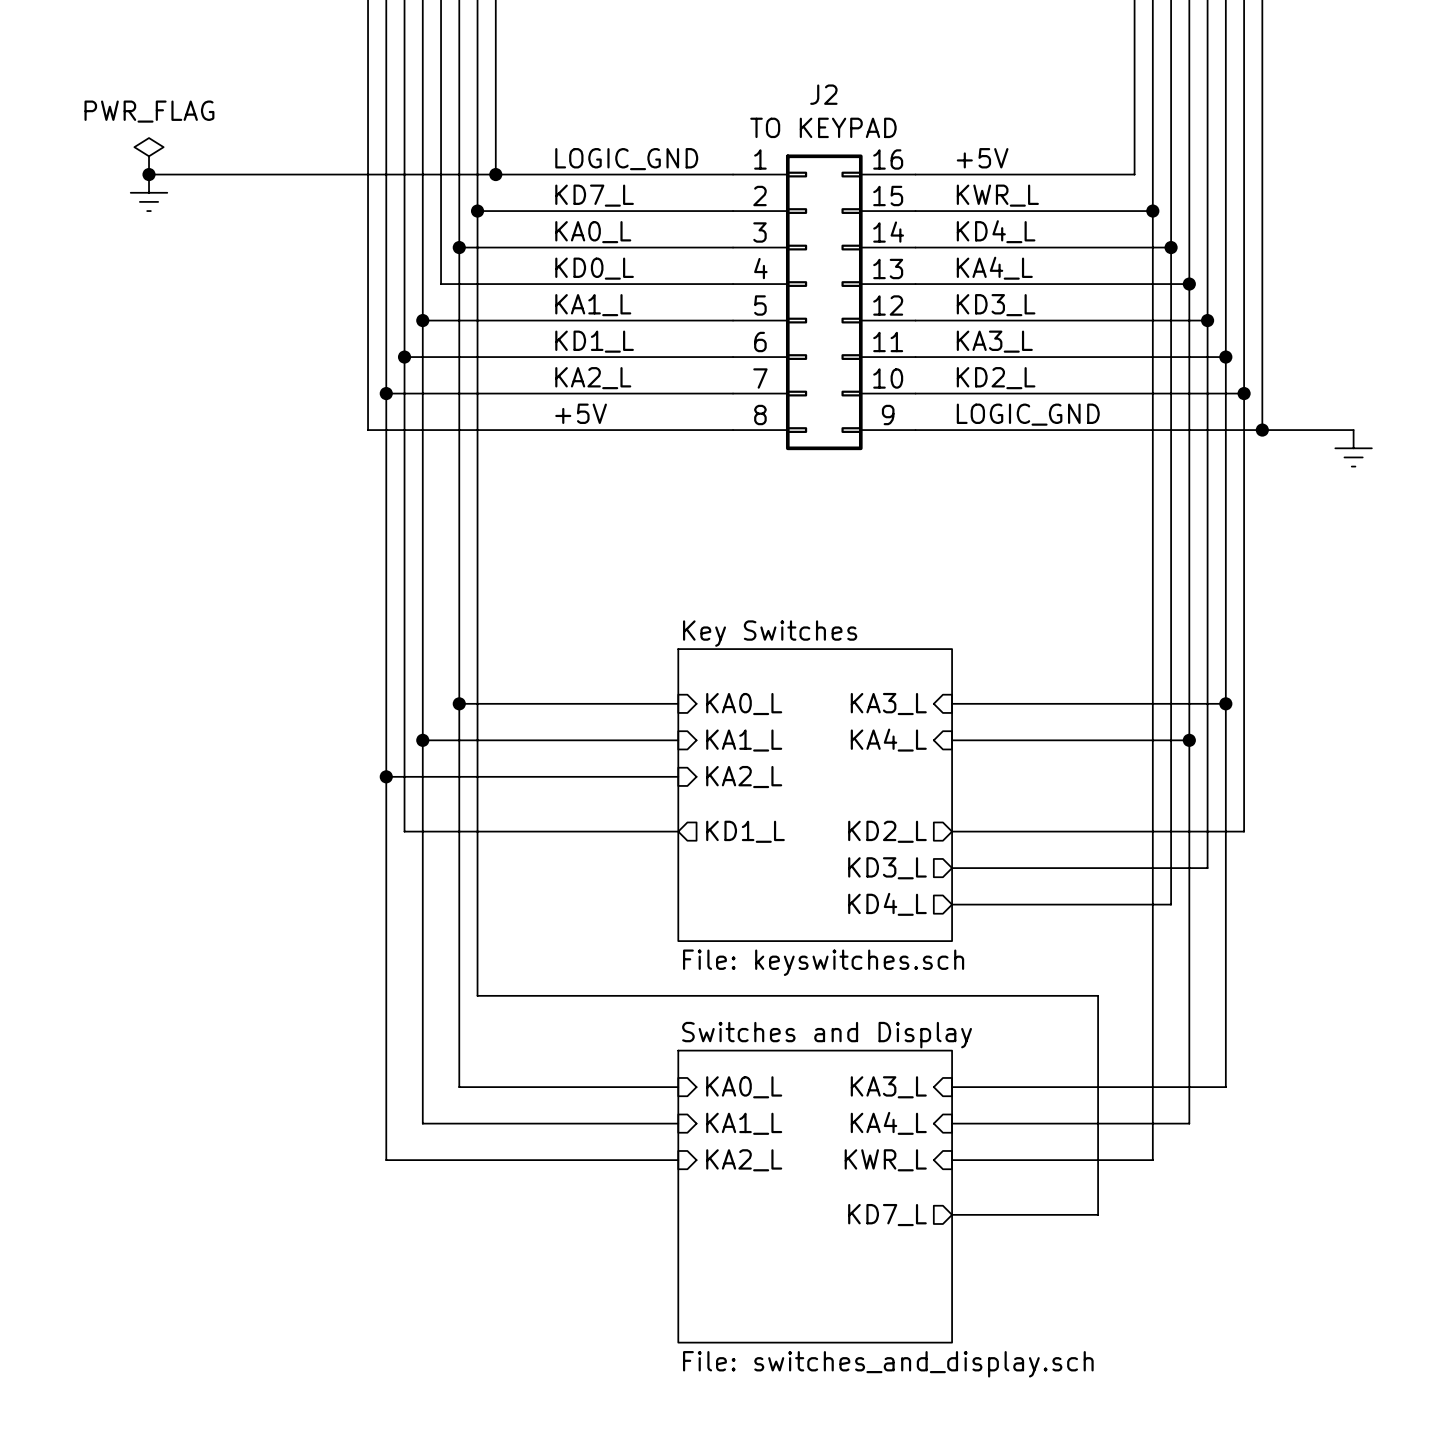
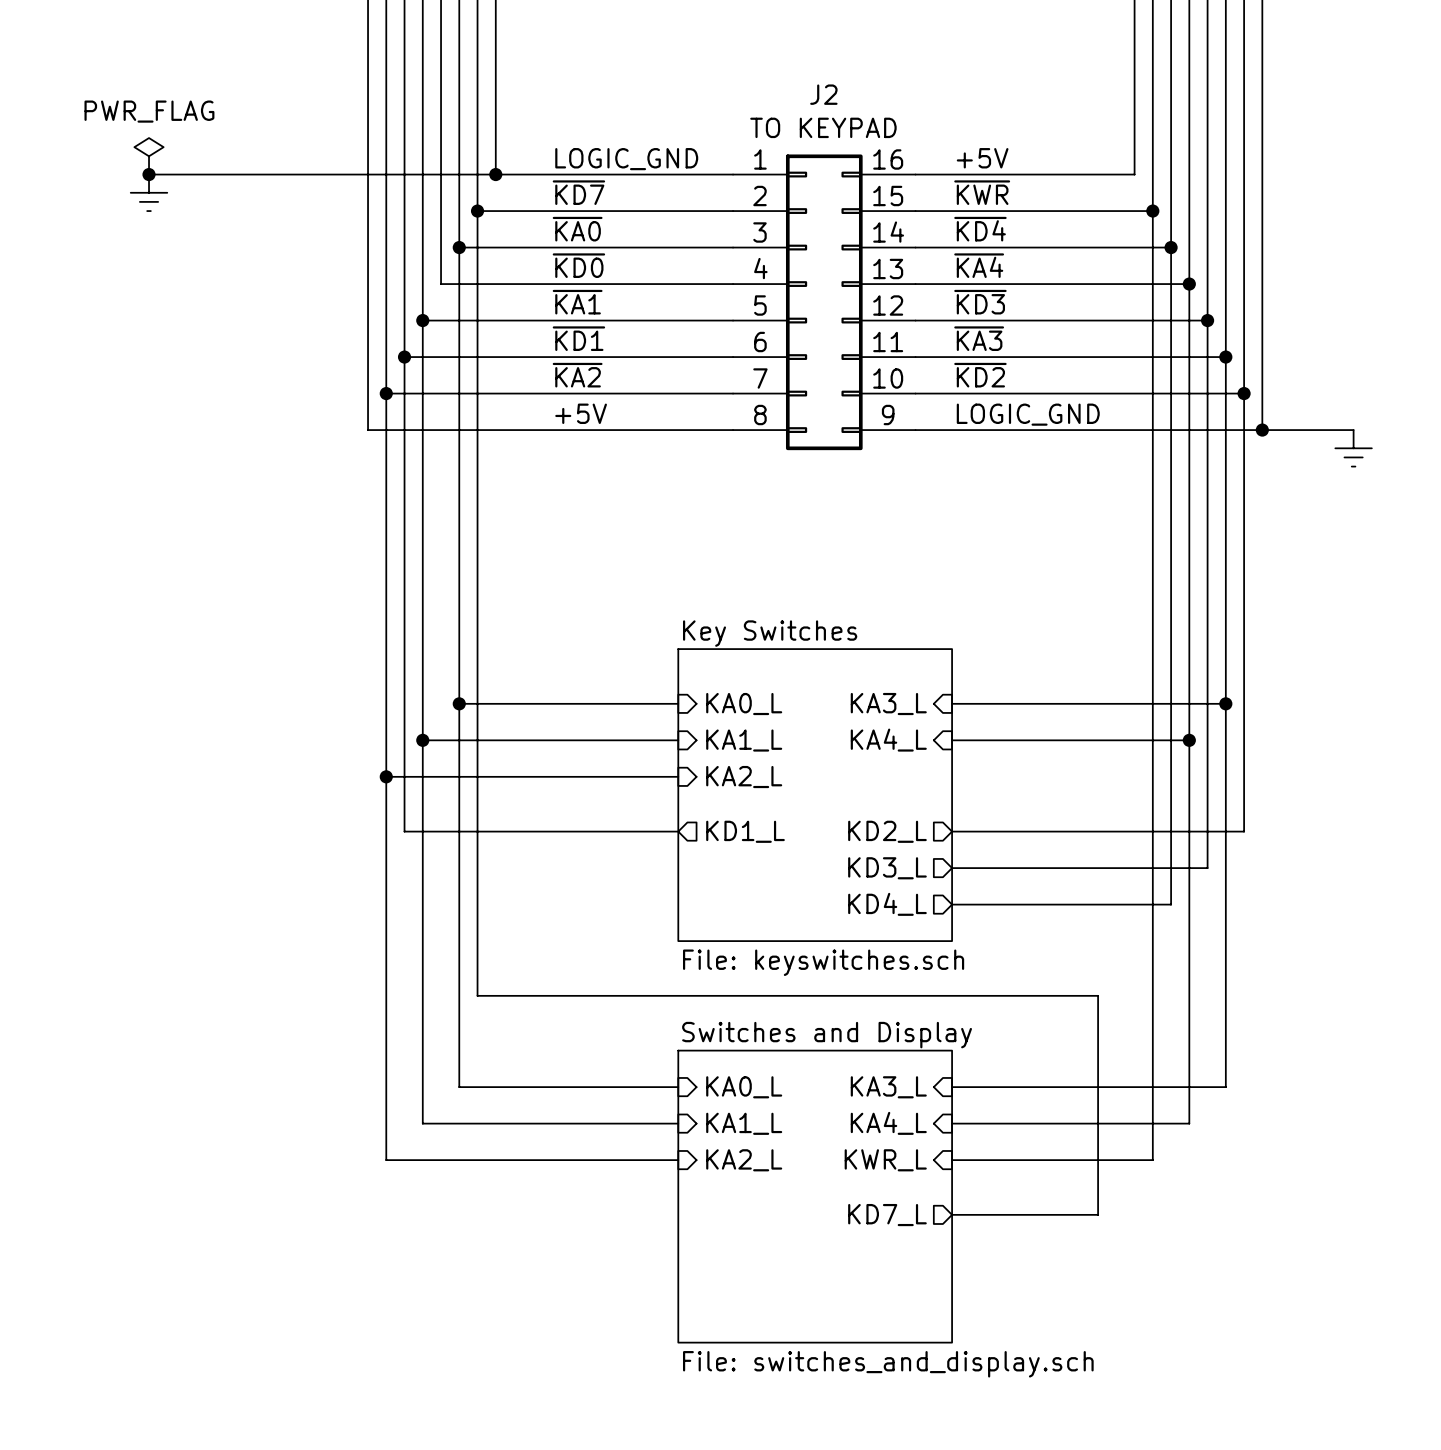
label: KD7_L (594, 195) -> ~{KD7} (578, 192)
label: KWR_L (997, 195) -> ~{KWR} (982, 192)
label: KD4_L (996, 231) -> ~{KD4} (980, 229)
label: KA0_L (593, 232) -> ~{KA0} (577, 229)
label: KD0_L (594, 268) -> ~{KD0} (578, 265)
label: KA4_L (994, 268) -> ~{KA4} (979, 265)
label: KA1_L (593, 305) -> ~{KA1} (577, 302)
label: KD3_L (996, 305) -> ~{KD3} (980, 302)
label: KD1_L (594, 341) -> ~{KD1} (578, 338)
label: KA3_L (994, 341) -> ~{KA3} (979, 338)
label: KA2_L (593, 378) -> ~{KA2} (577, 375)
label: KD2_L (996, 378) -> ~{KD2} (980, 375)

